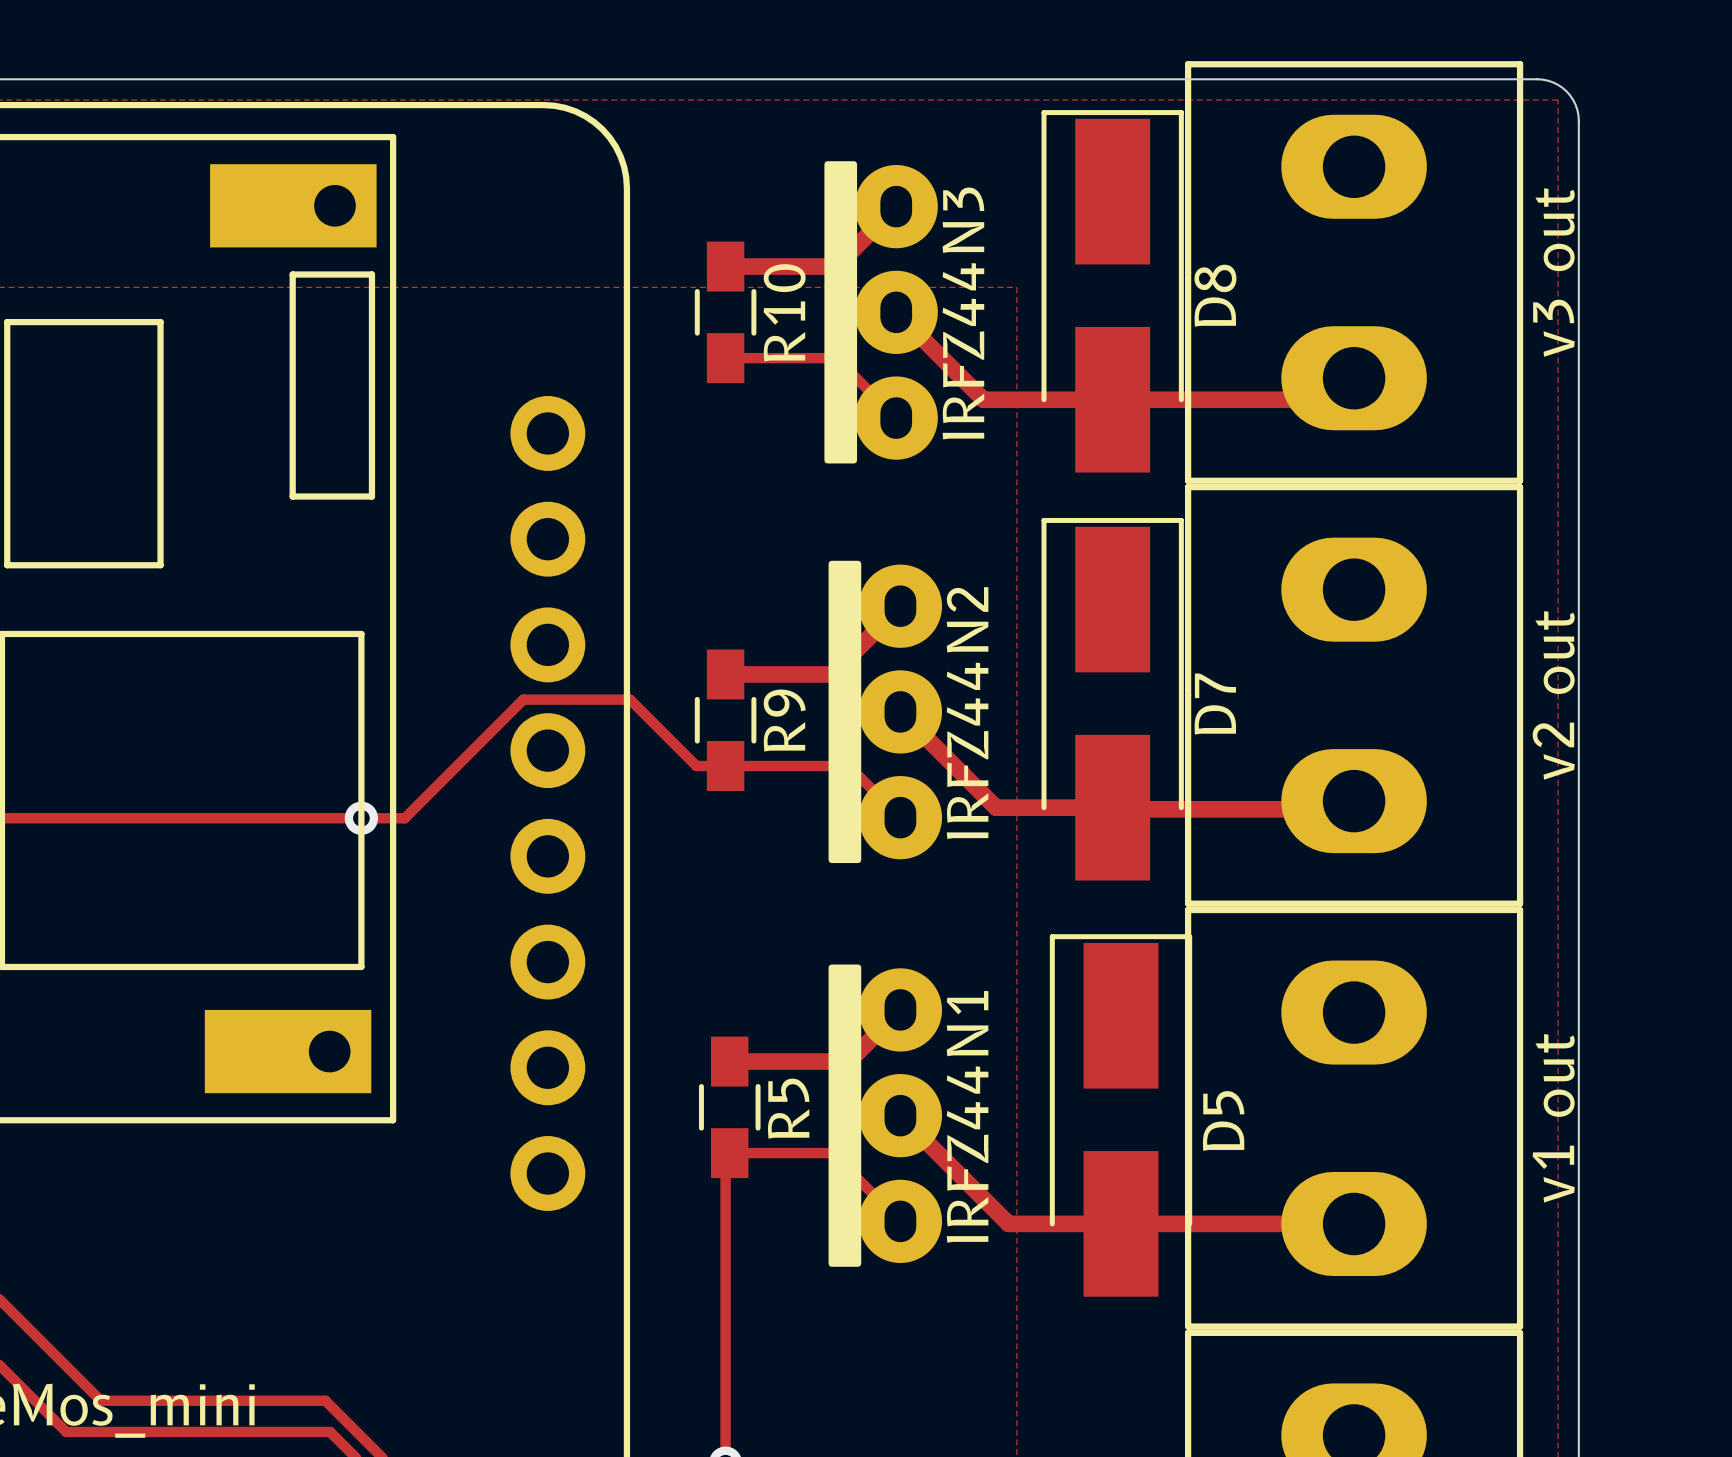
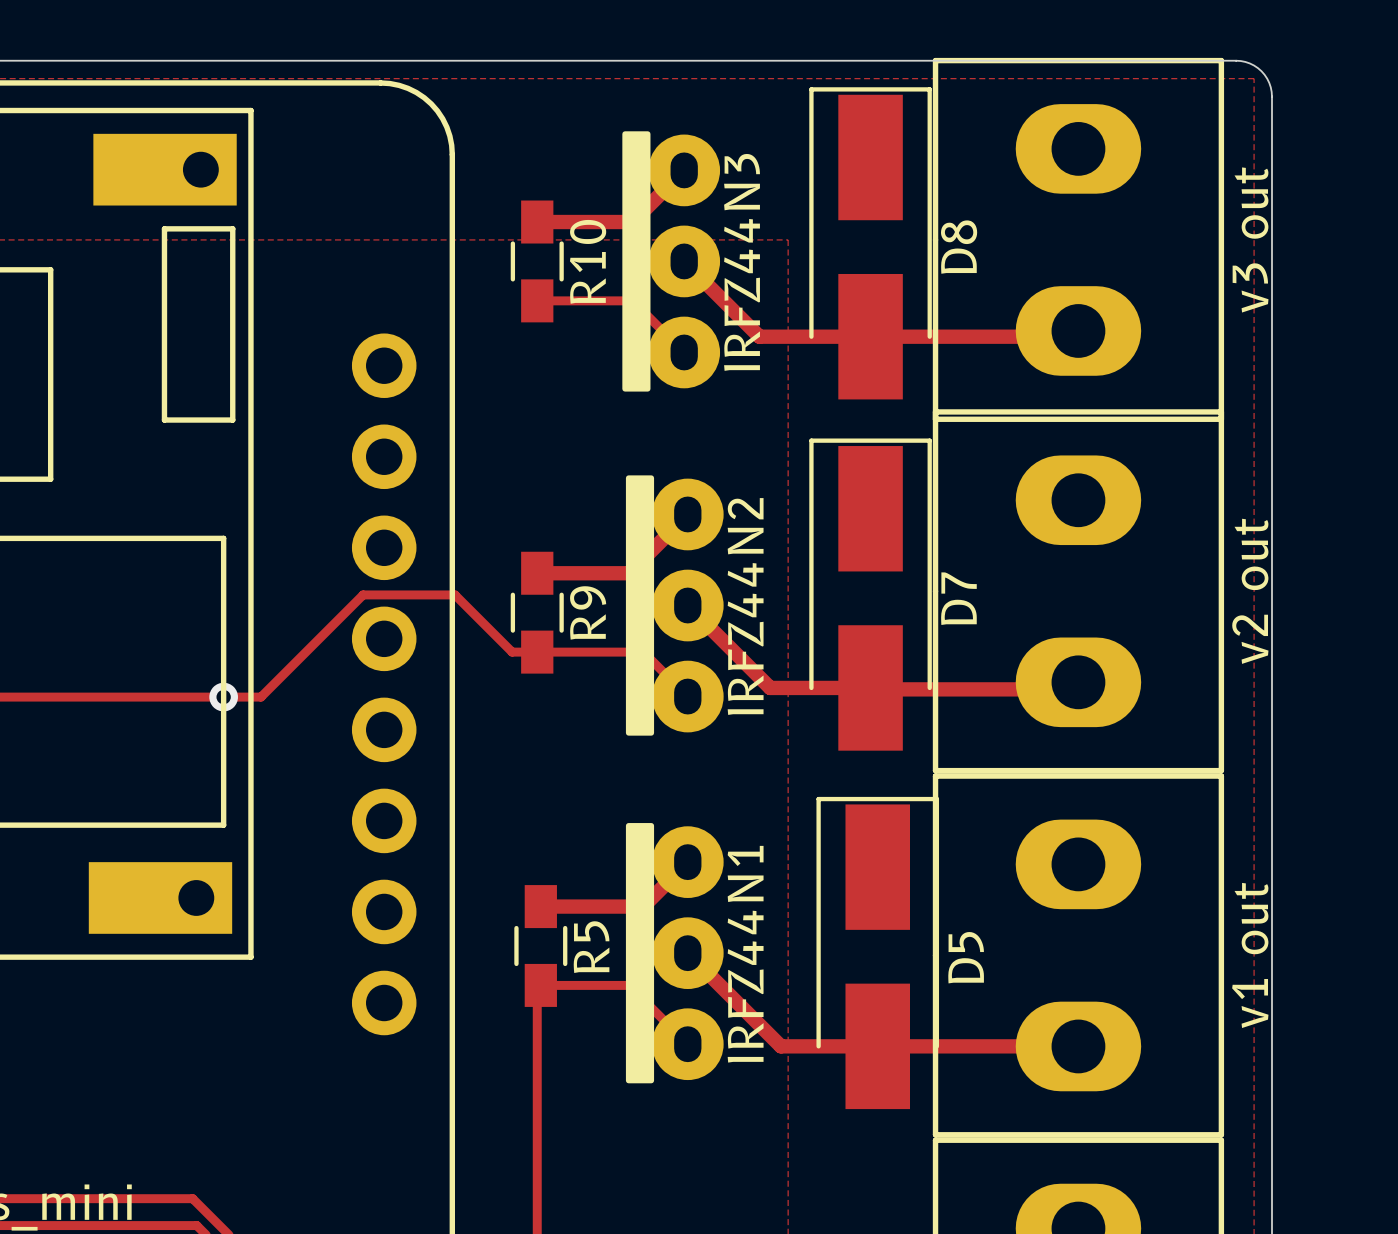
part position: (1354, 272) -> (1078, 239)

